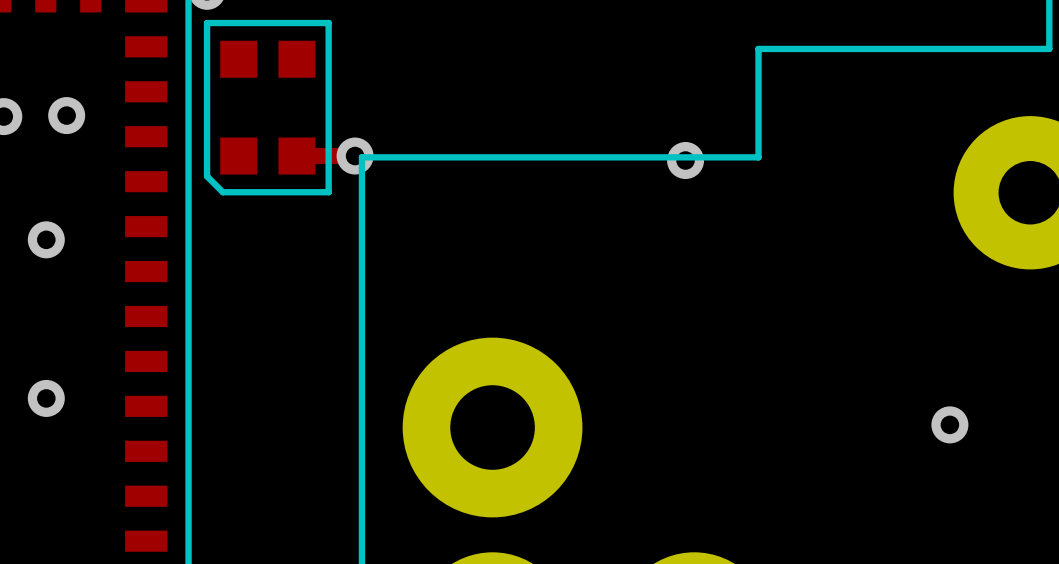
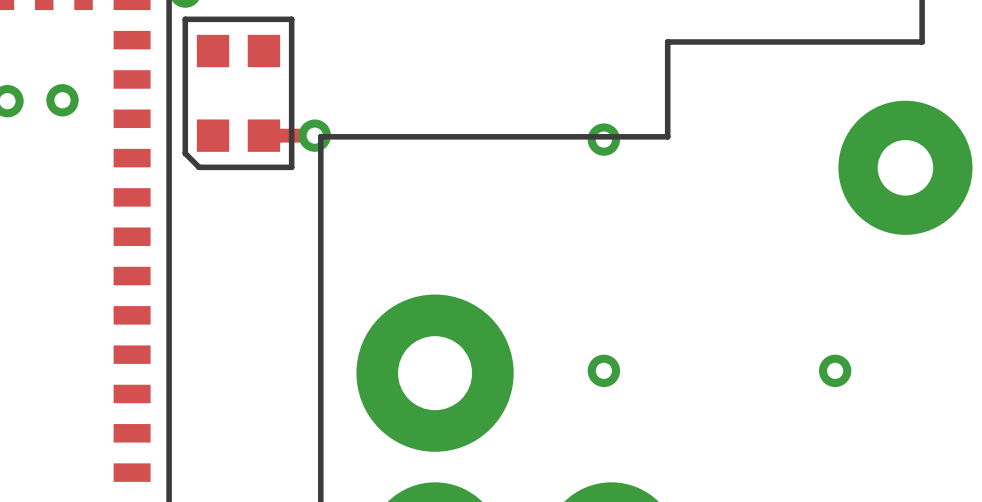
via: (46, 239) -> none
via: (46, 398) -> none
via: none -> (603, 370)

